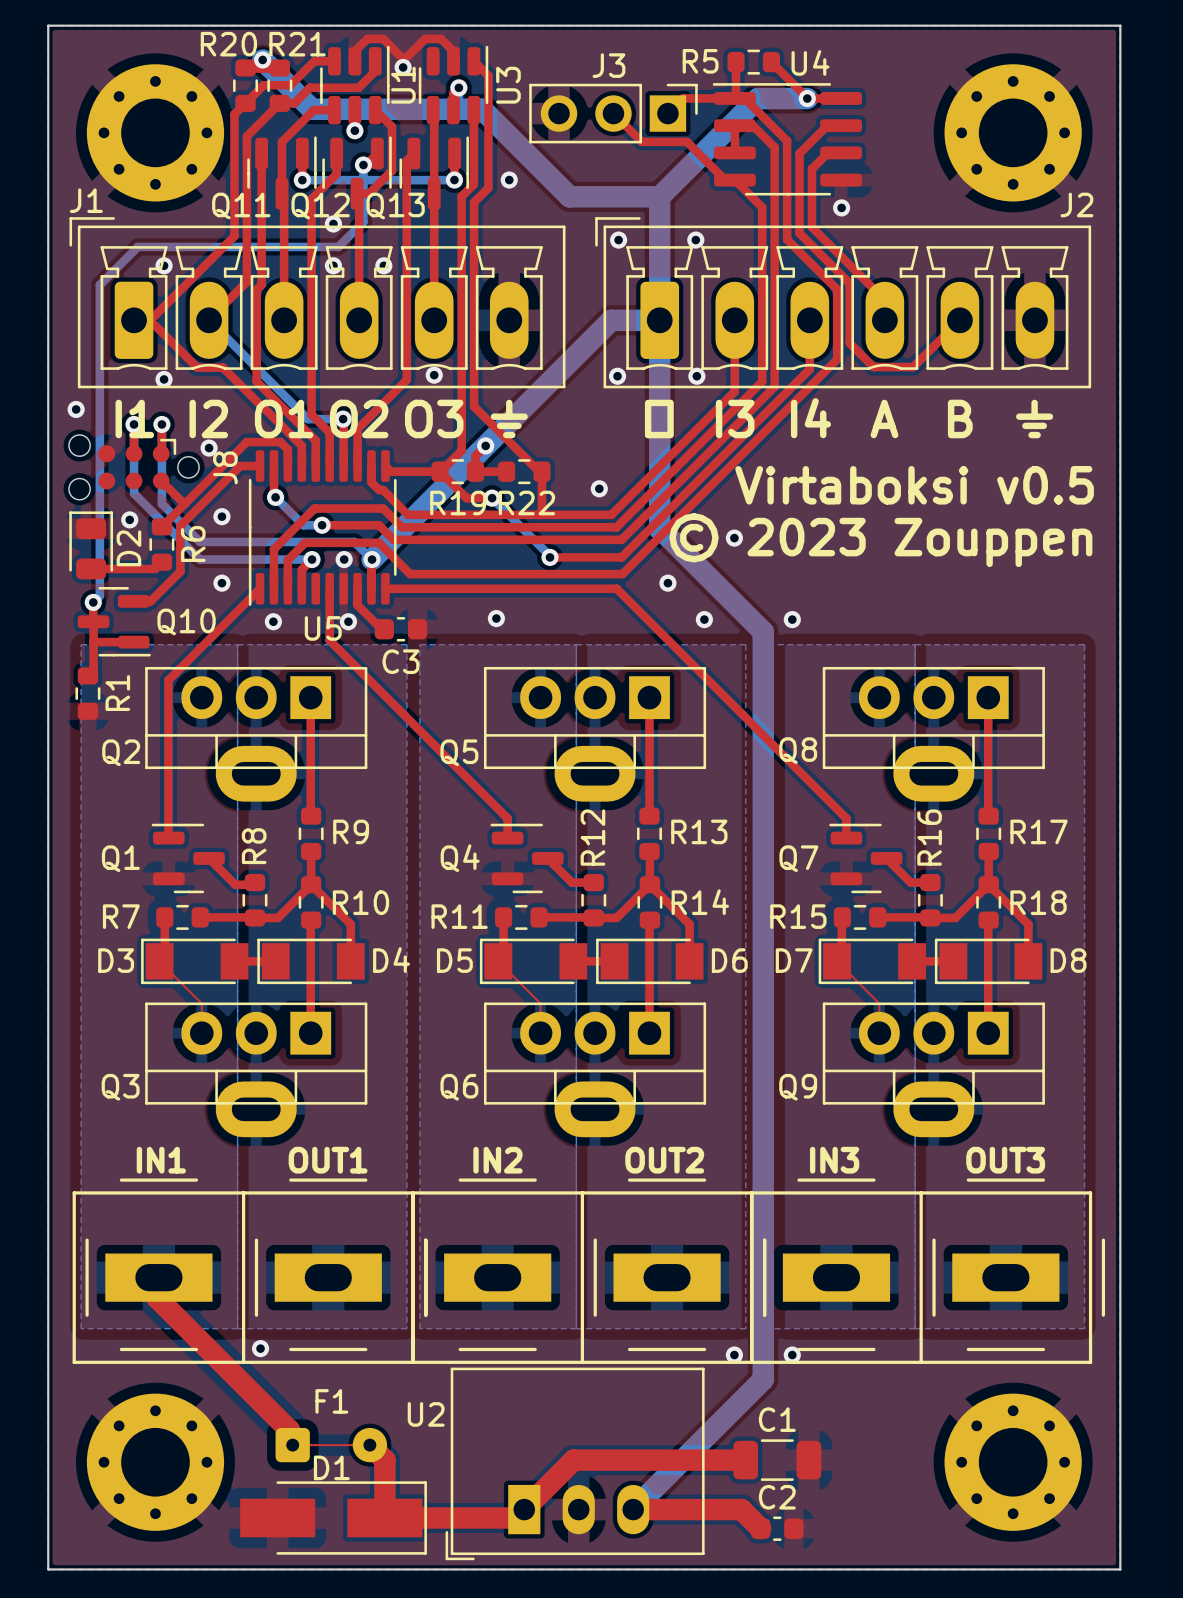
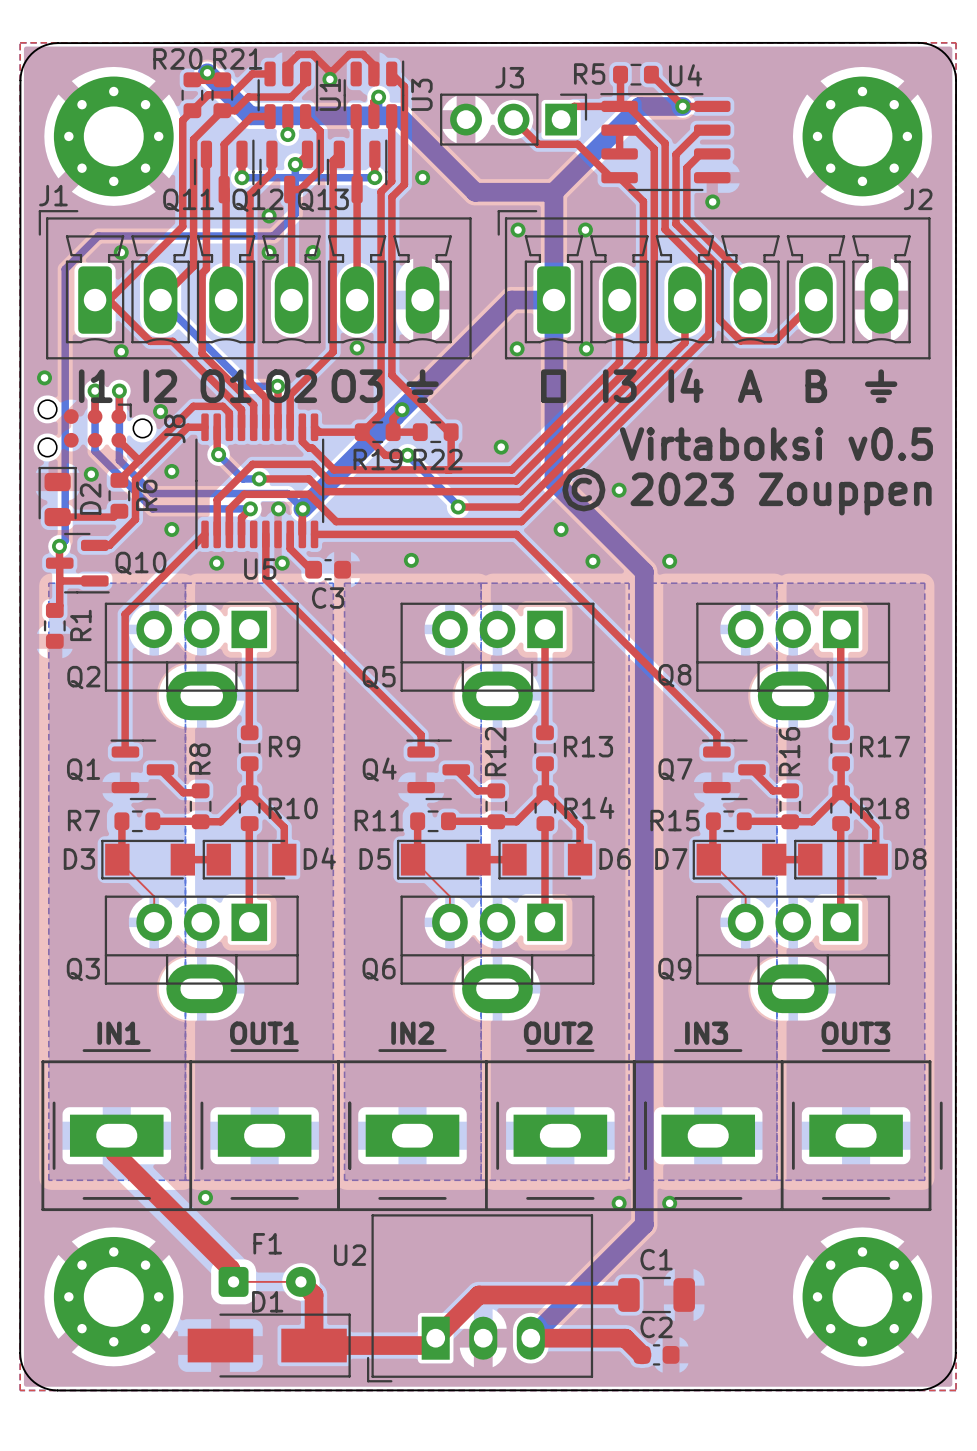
board edge: (48, 25) (1120, 25) (1120, 1569) (48, 1569) (48, 25) -> (918, 42) (57, 43) (41, 46) (26, 60) (20, 80) (20, 1353) (25, 1372) (37, 1384) (57, 1390) (918, 1390) (938, 1384) (950, 1372) (955, 1352) (956, 80) (952, 64) (945, 53) (930, 44) (918, 42)

